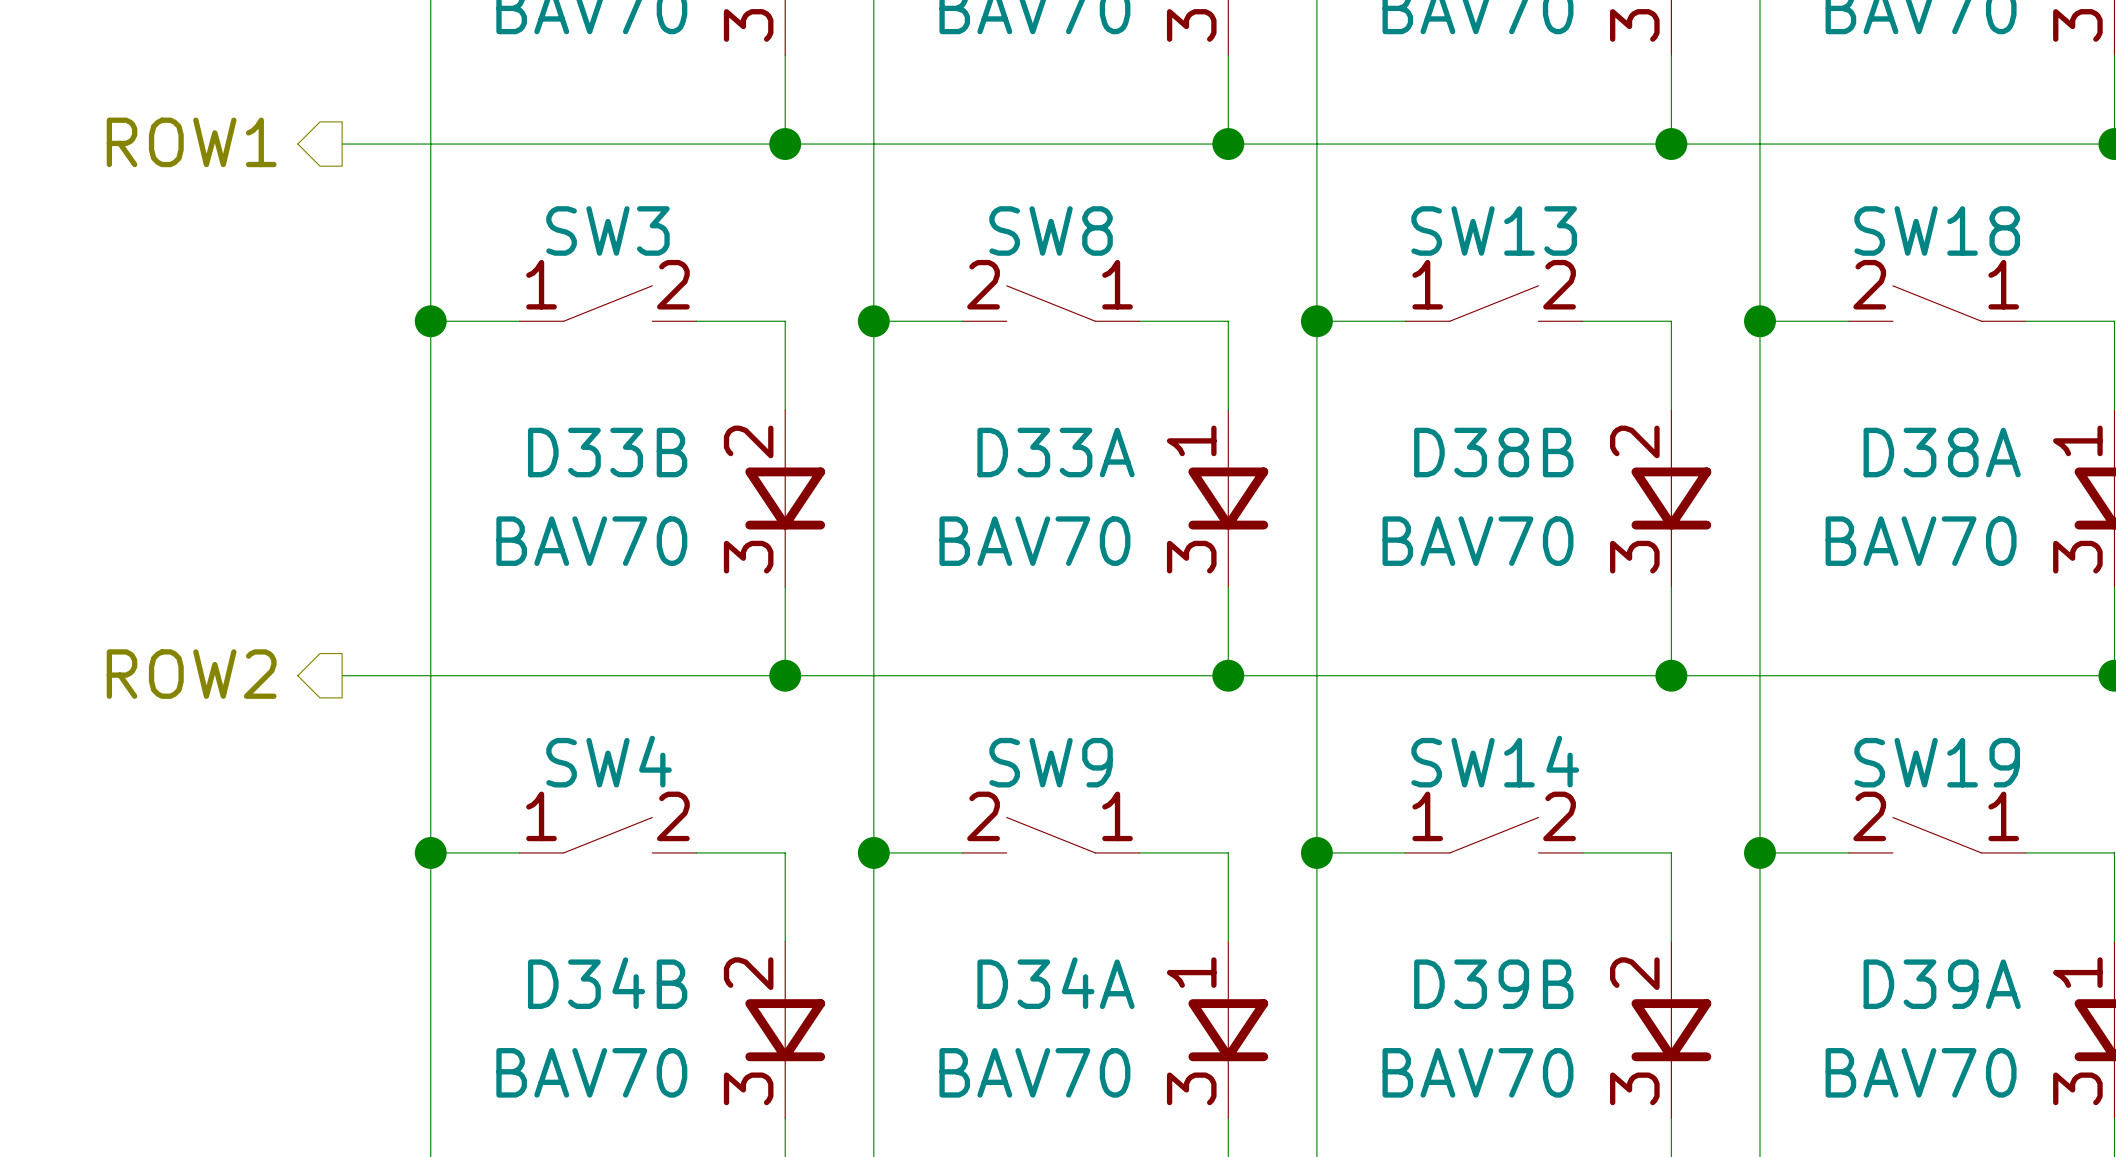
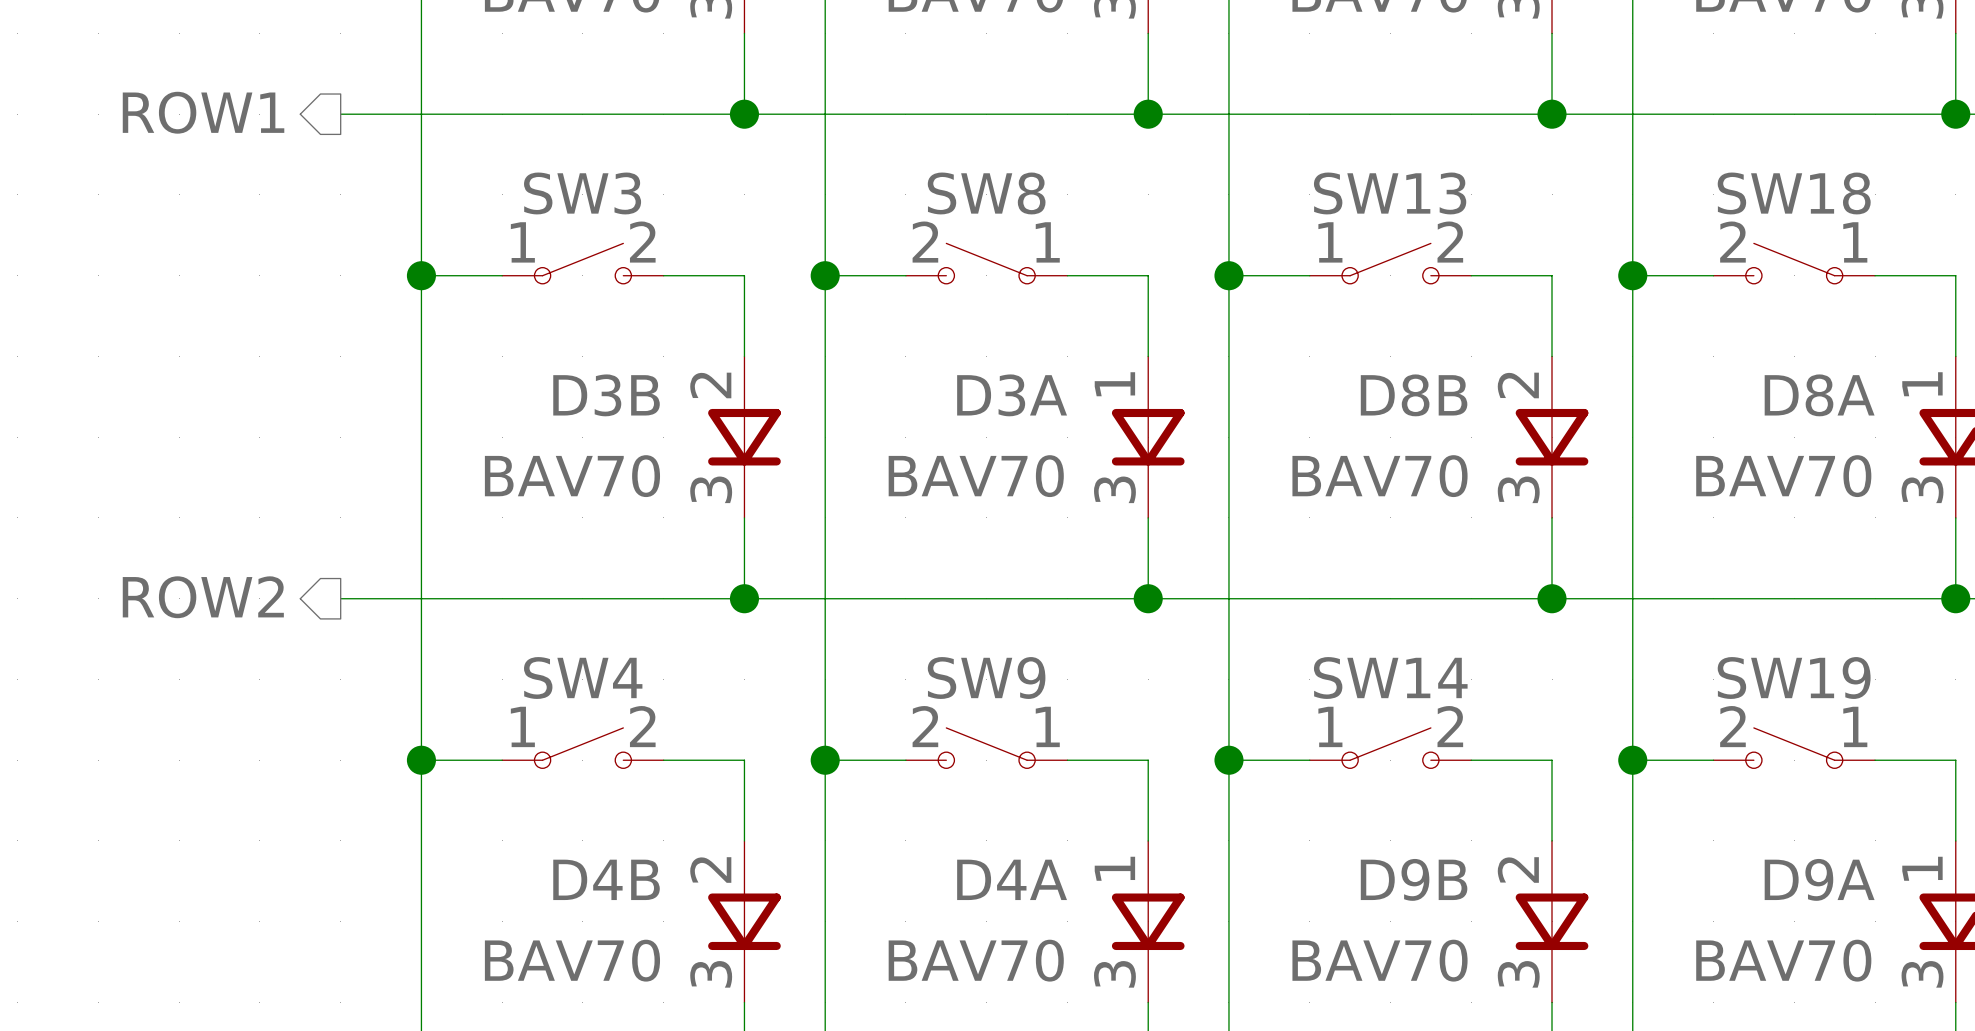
SW3 symbol: [519, 285, 697, 322] -> [502, 243, 664, 284]
SW8 symbol: [962, 285, 1140, 322] -> [905, 243, 1068, 284]
SW13 symbol: [1405, 285, 1583, 322] -> [1309, 243, 1472, 284]
SW18 symbol: [1848, 285, 2026, 322] -> [1713, 243, 1876, 284]
D33B name: D33B (607, 452) -> D3B (606, 395)
D33A name: D33A (1056, 452) -> D3A (1012, 395)
D38B name: D38B (1493, 452) -> D8B (1414, 395)
D38A name: D38A (1942, 452) -> D8A (1819, 395)
SW4 symbol: [519, 817, 697, 853] -> [502, 727, 664, 769]
SW9 symbol: [962, 817, 1140, 853] -> [905, 727, 1068, 769]
SW14 symbol: [1405, 817, 1583, 853] -> [1309, 727, 1472, 769]
SW19 symbol: [1848, 817, 2026, 853] -> [1713, 727, 1876, 769]
D34B name: D34B (607, 983) -> D4B (606, 879)
D34A name: D34A (1056, 983) -> D4A (1012, 879)
D39B name: D39B (1493, 984) -> D9B (1414, 879)
D39A name: D39A (1942, 984) -> D9A (1819, 879)

